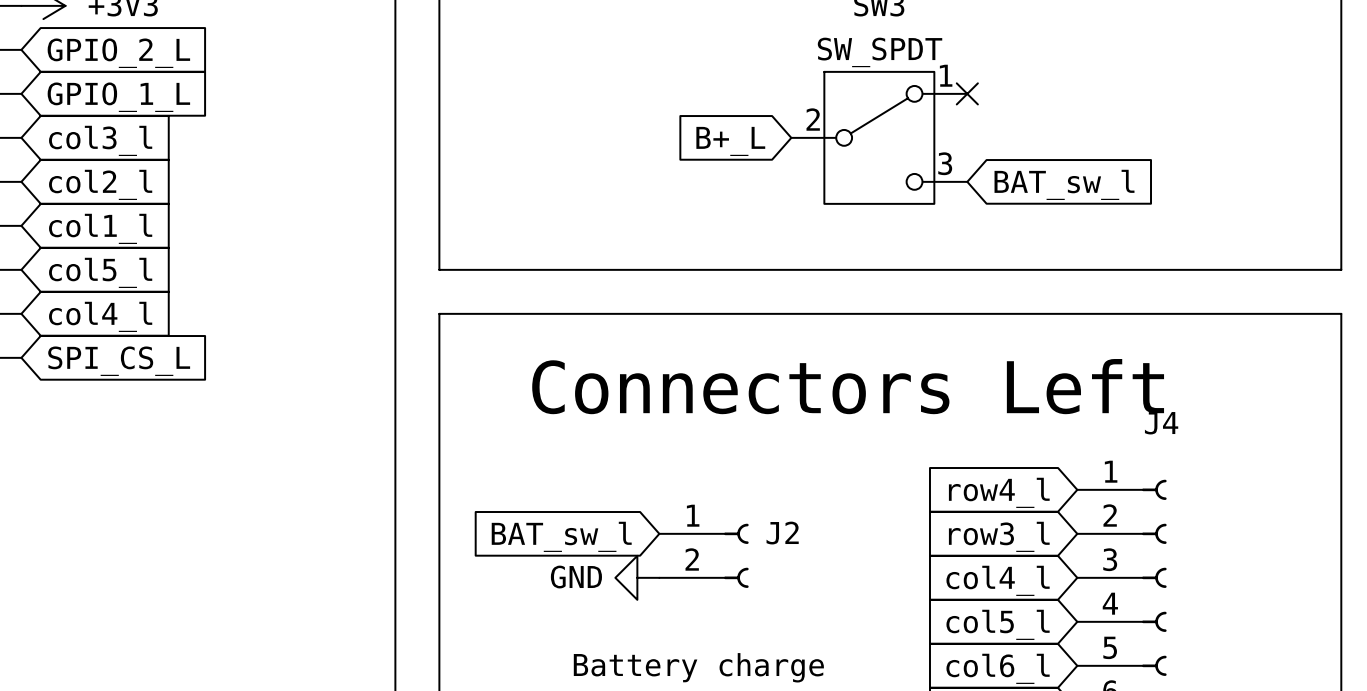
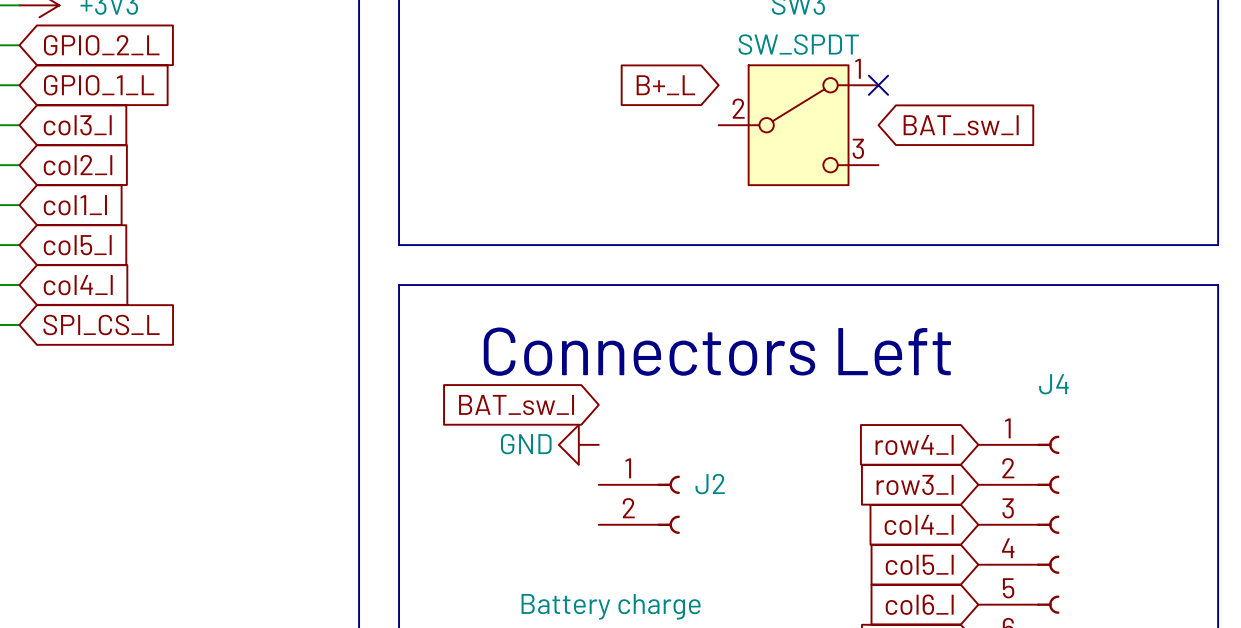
global label position: B+_L (730, 141) -> B+_L (665, 85)
global label position: BAT_sw_l (1064, 184) -> BAT_sw_l (961, 125)
global label position: BAT_sw_l (561, 536) -> BAT_sw_l (516, 404)
power symbol position: GND (637, 577) -> GND (578, 444)

